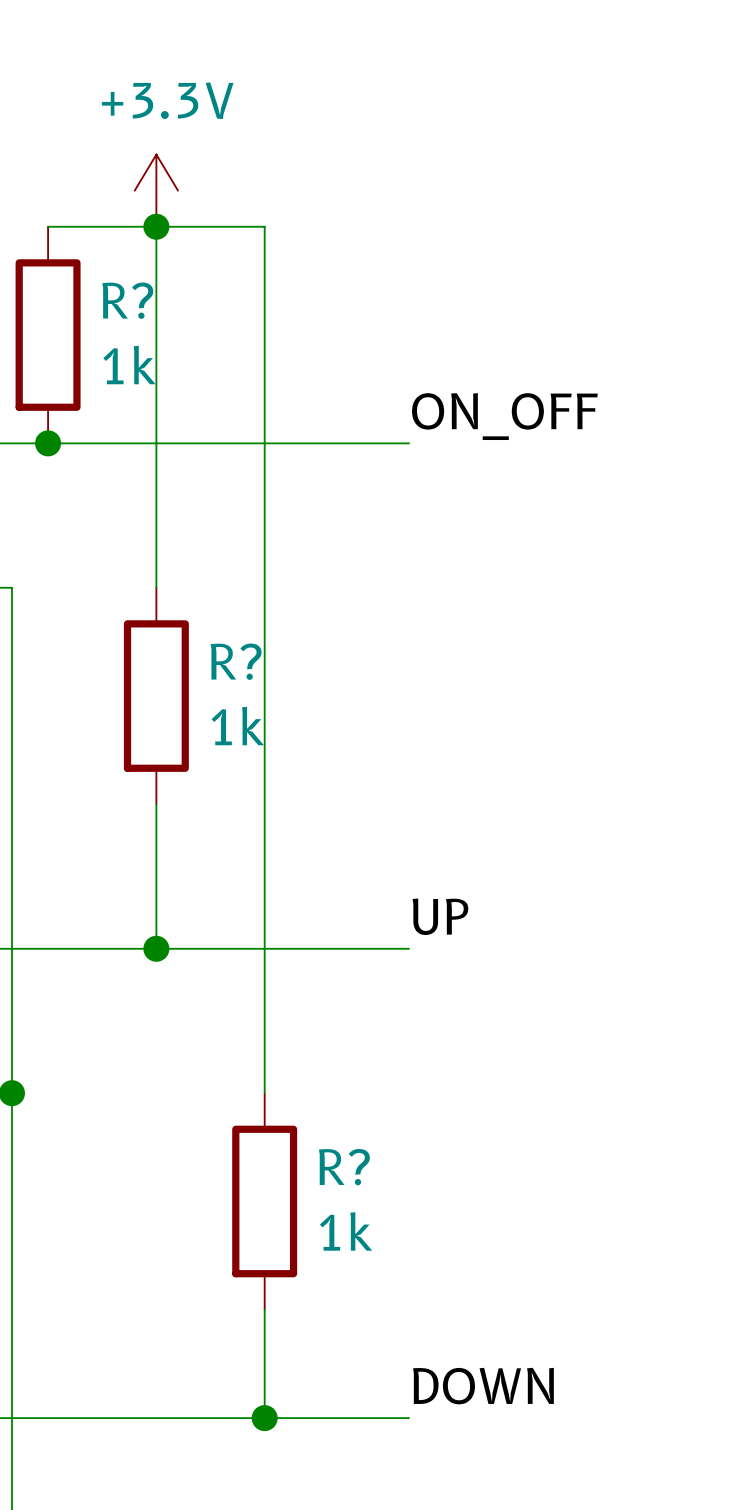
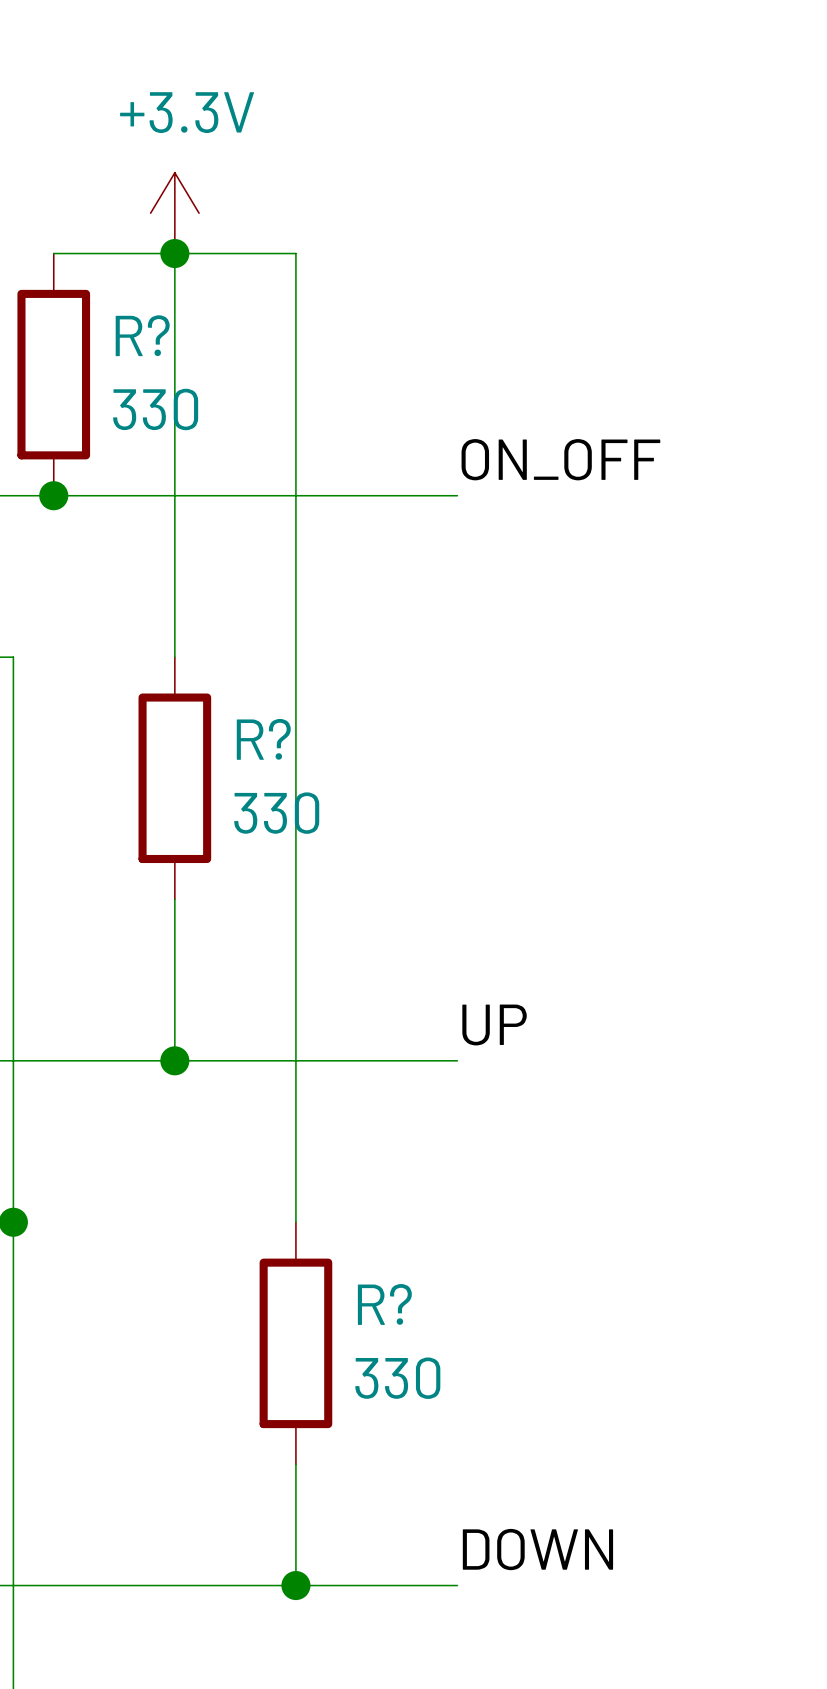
R? value: 1k (129, 365) -> 330 (155, 409)
R? value: 1k (237, 726) -> 330 (276, 813)
R? value: 1k (346, 1231) -> 330 (397, 1378)

